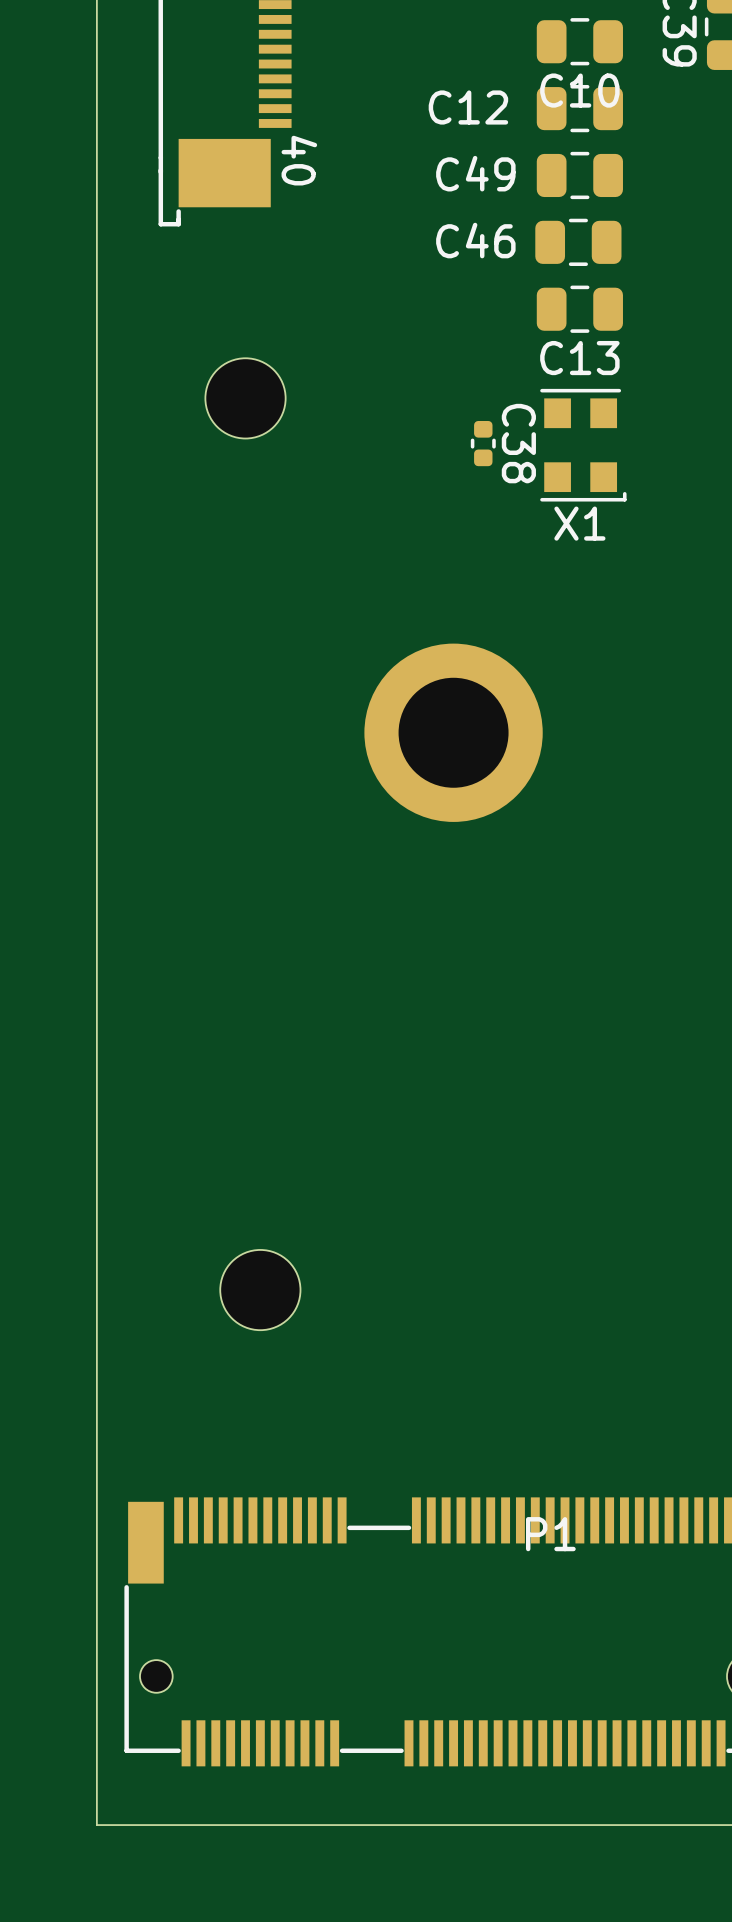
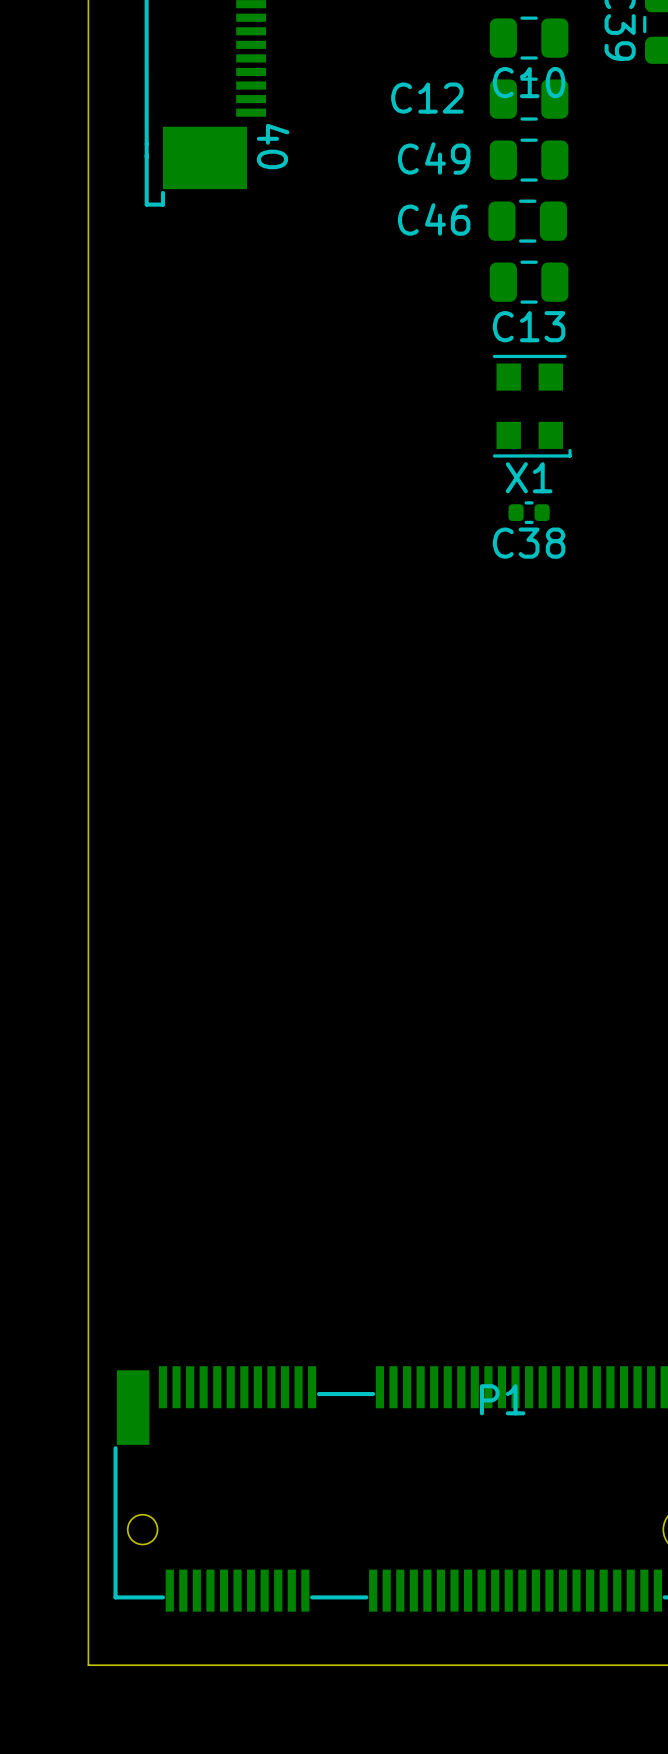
part: (245, 398) -> none
C38 rotation: 0° (483, 443) -> 90° clockwise (529, 512)
C38 position: (483, 443) -> (529, 512)
part: (453, 732) -> none
part: (260, 1290) -> none

